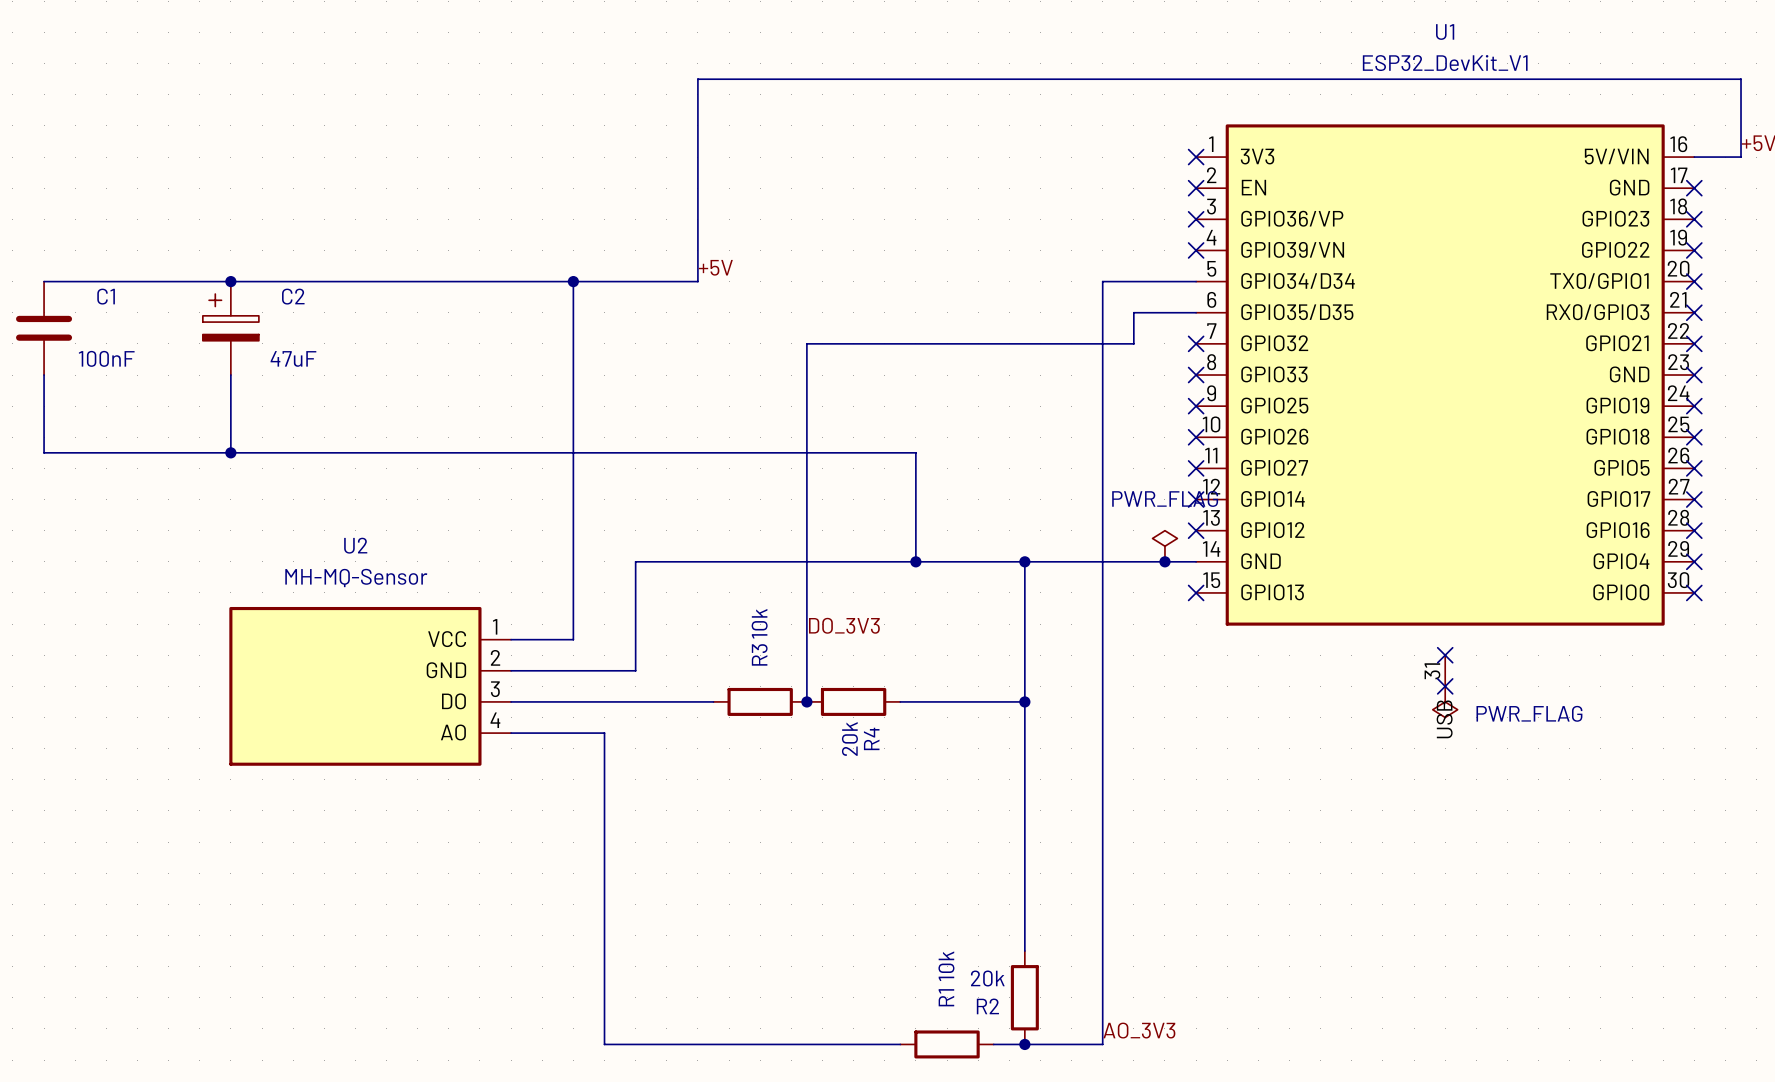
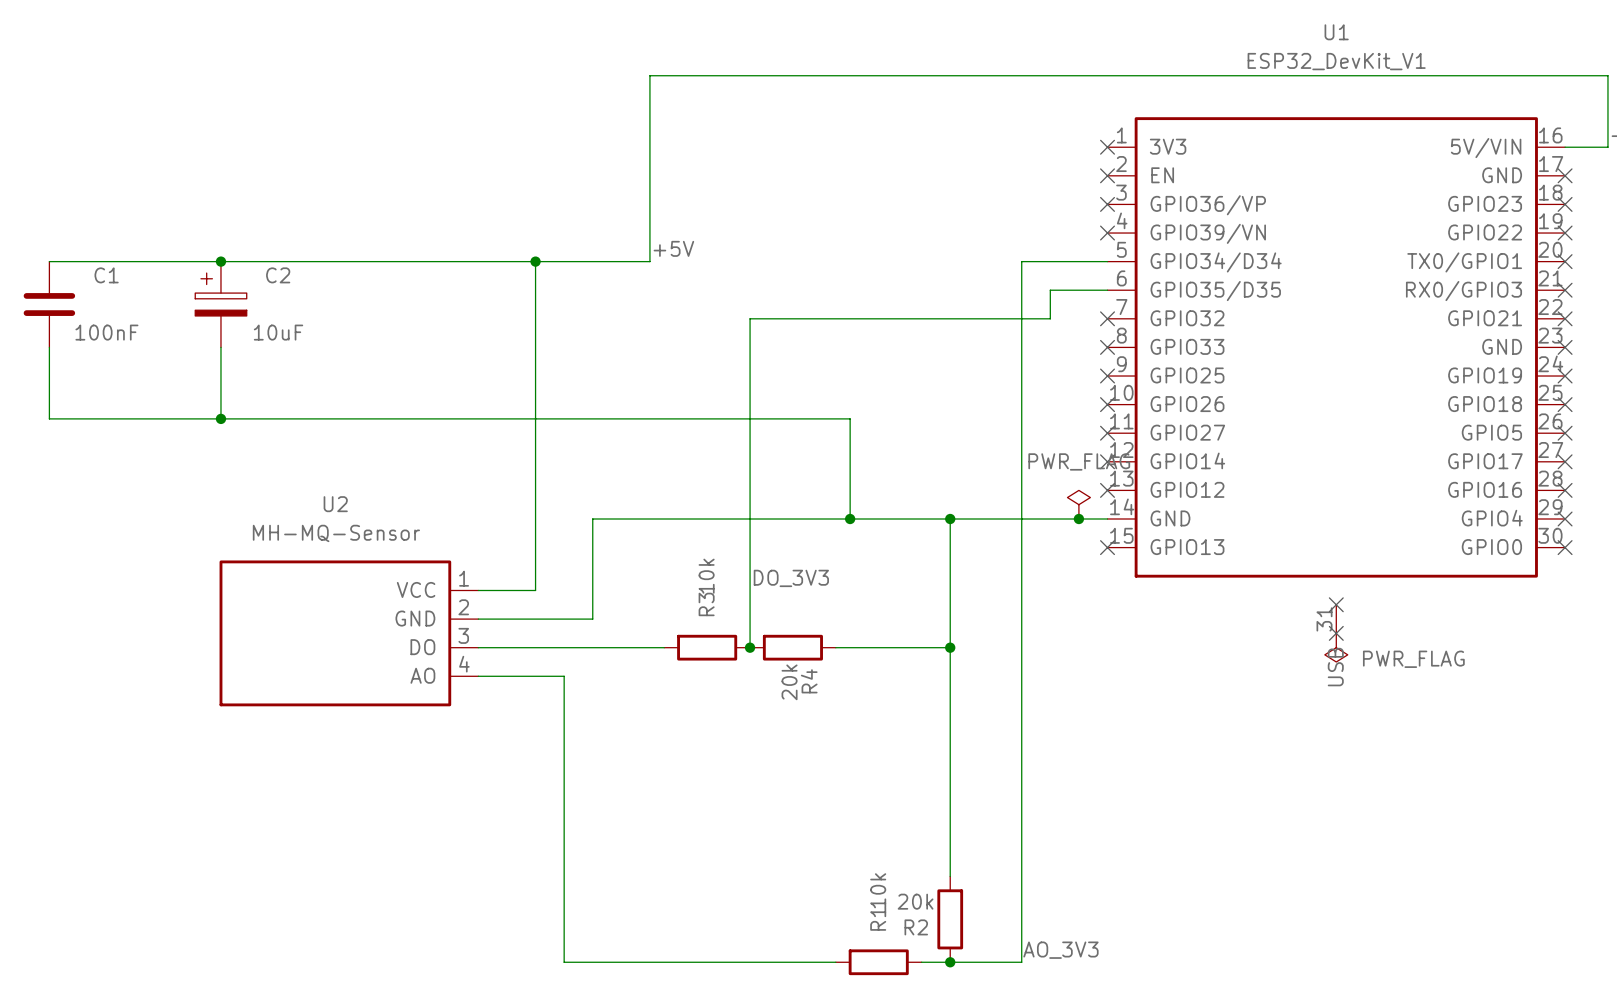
C2 value: 47uF (293, 358) -> 10uF (278, 332)

